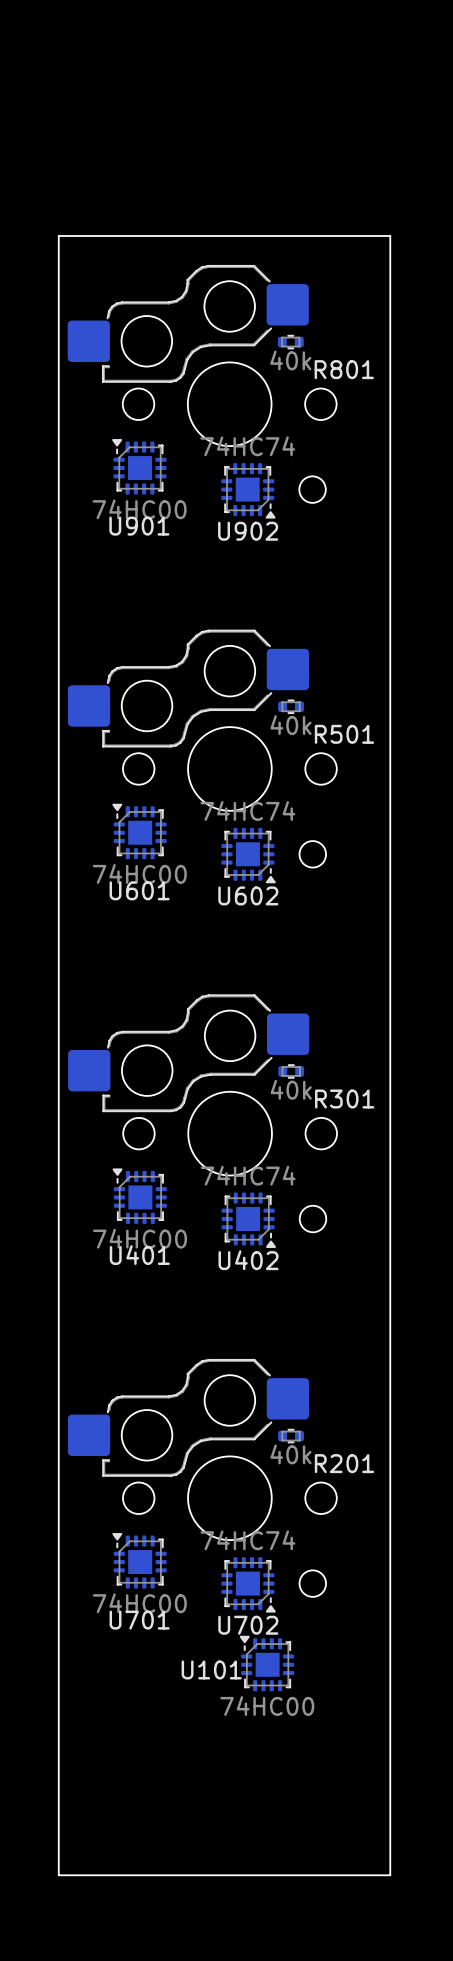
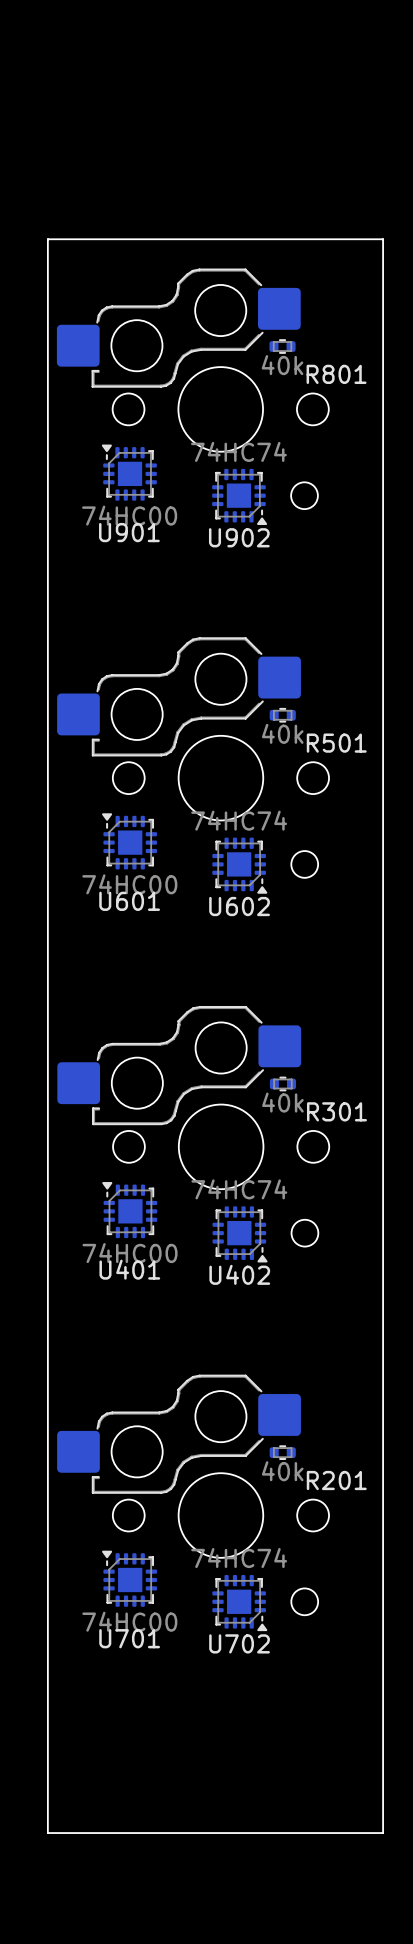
U101: 74HC00 (266, 1663) -> none
board edge: (390, 1812) (390, 1875) (58, 1875) (58, 1812) -> (383, 1833) (47, 1833)

